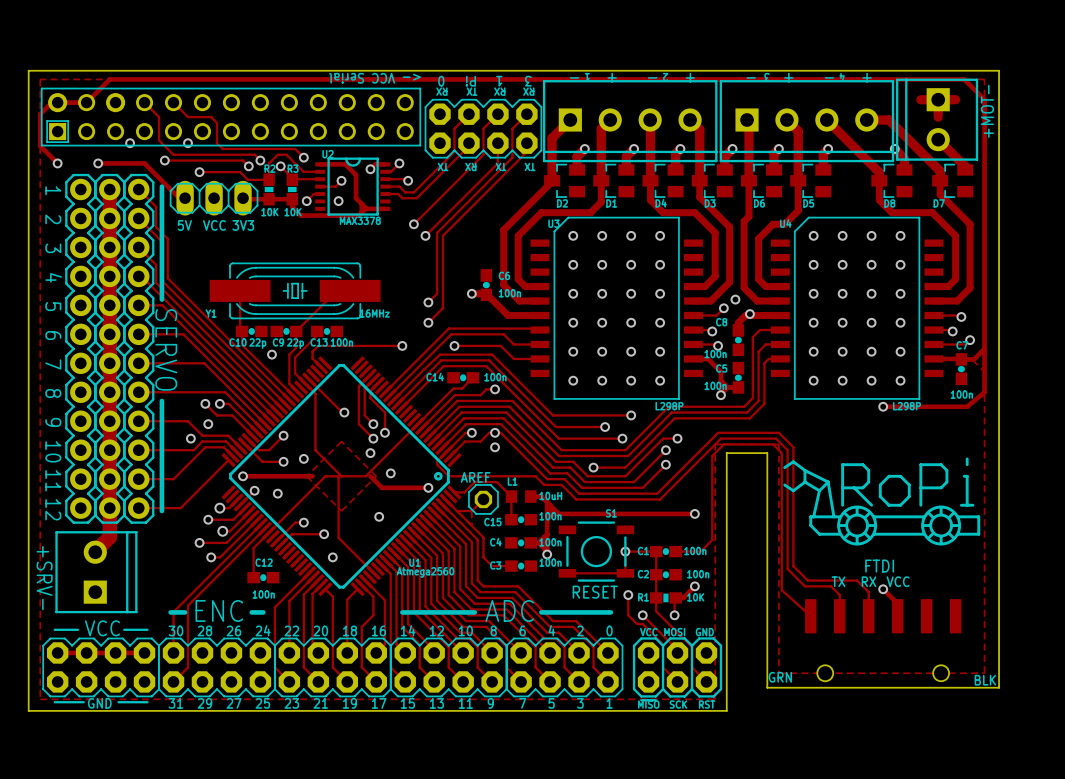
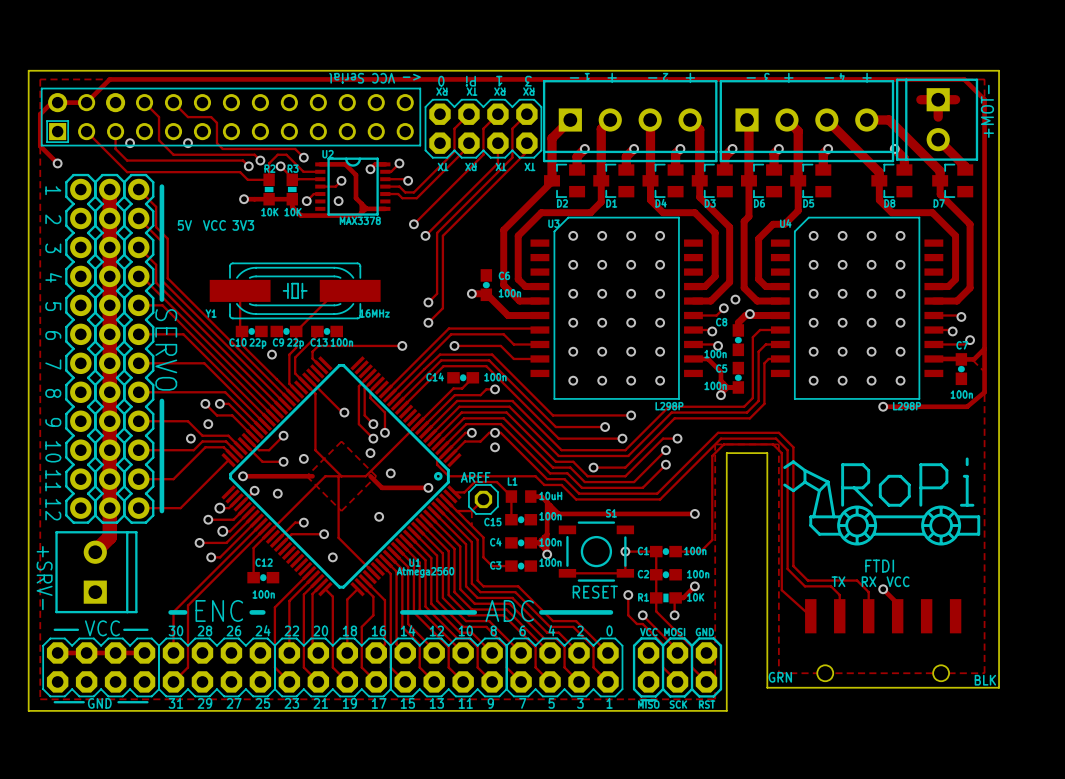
track: none -> (86, 131) (127, 172) (199, 172)
track: none -> (115, 131) (115, 148) (127, 160) (164, 160)
via: (164, 160) -> none
track: (98, 163) (144, 163) (179, 198) (185, 198) -> none
via: (98, 163) -> none
via: (199, 172) -> none
part: (214, 198) -> none
via: none -> (244, 199)

